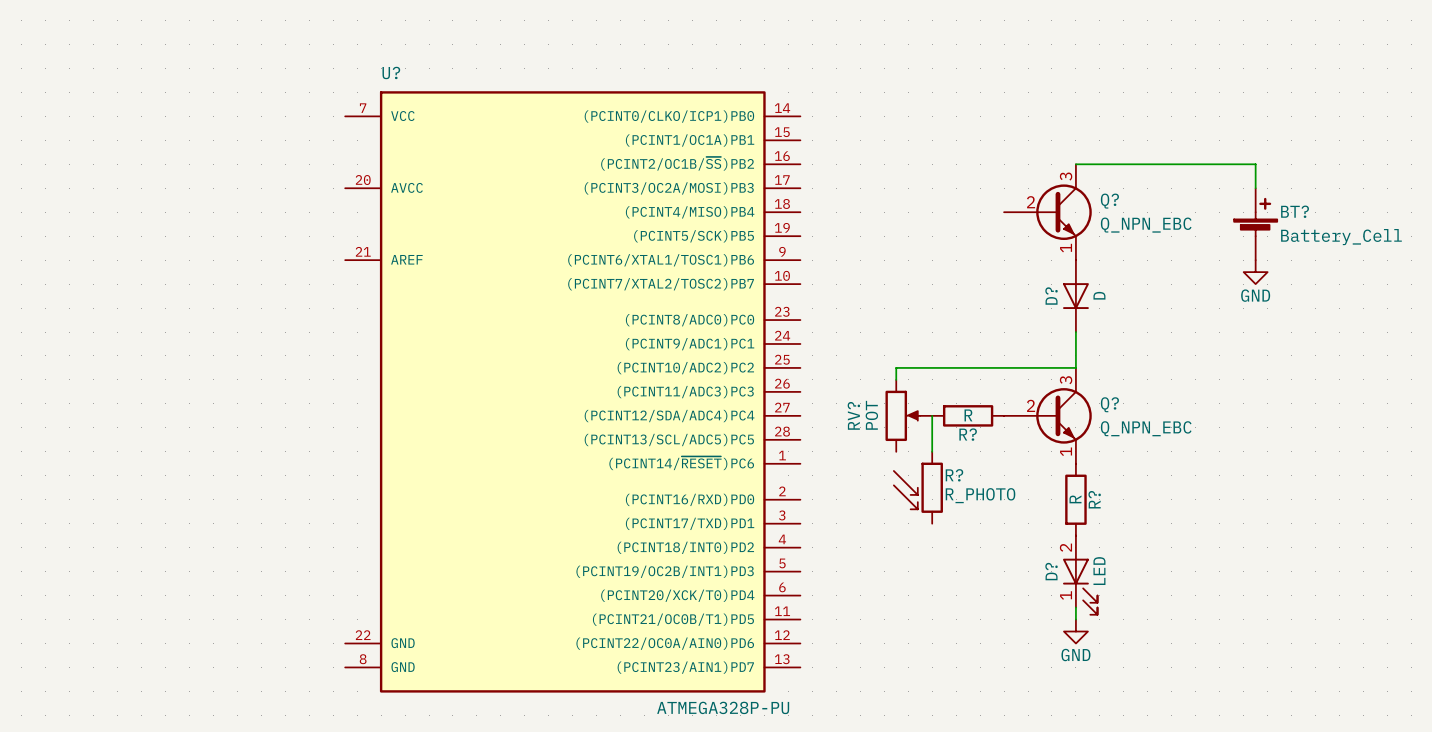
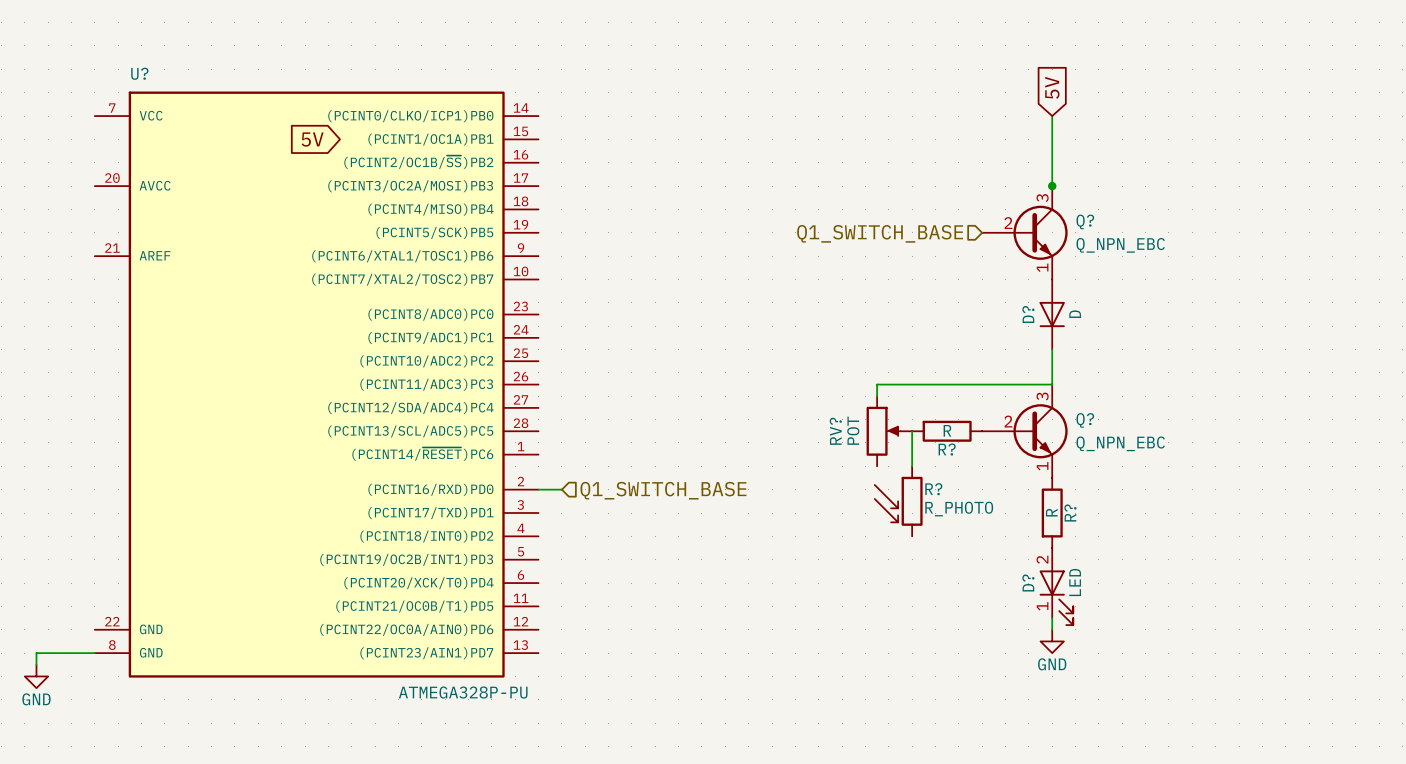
global label: none -> 5V (1052, 87)
global label: none -> 5V (312, 139)
wire: (1075, 164) (1255, 164) (1255, 188) -> (1052, 186) (1052, 116)
junction: none -> (1052, 186)
hierarchical label: none -> Q1_SWITCH_BASE (880, 233)
BT?: Battery_Cell (1255, 224) -> none
power symbol: GND (1255, 272) -> none
U?: none -> ATMEGA328P-PU (316, 384)
U?: ATMEGA328P-PU (572, 391) -> none
hierarchical label: none -> Q1_SWITCH_BASE (663, 490)
wire: none -> (94, 653) (36, 653) (36, 664)
power symbol: none -> GND (36, 676)

